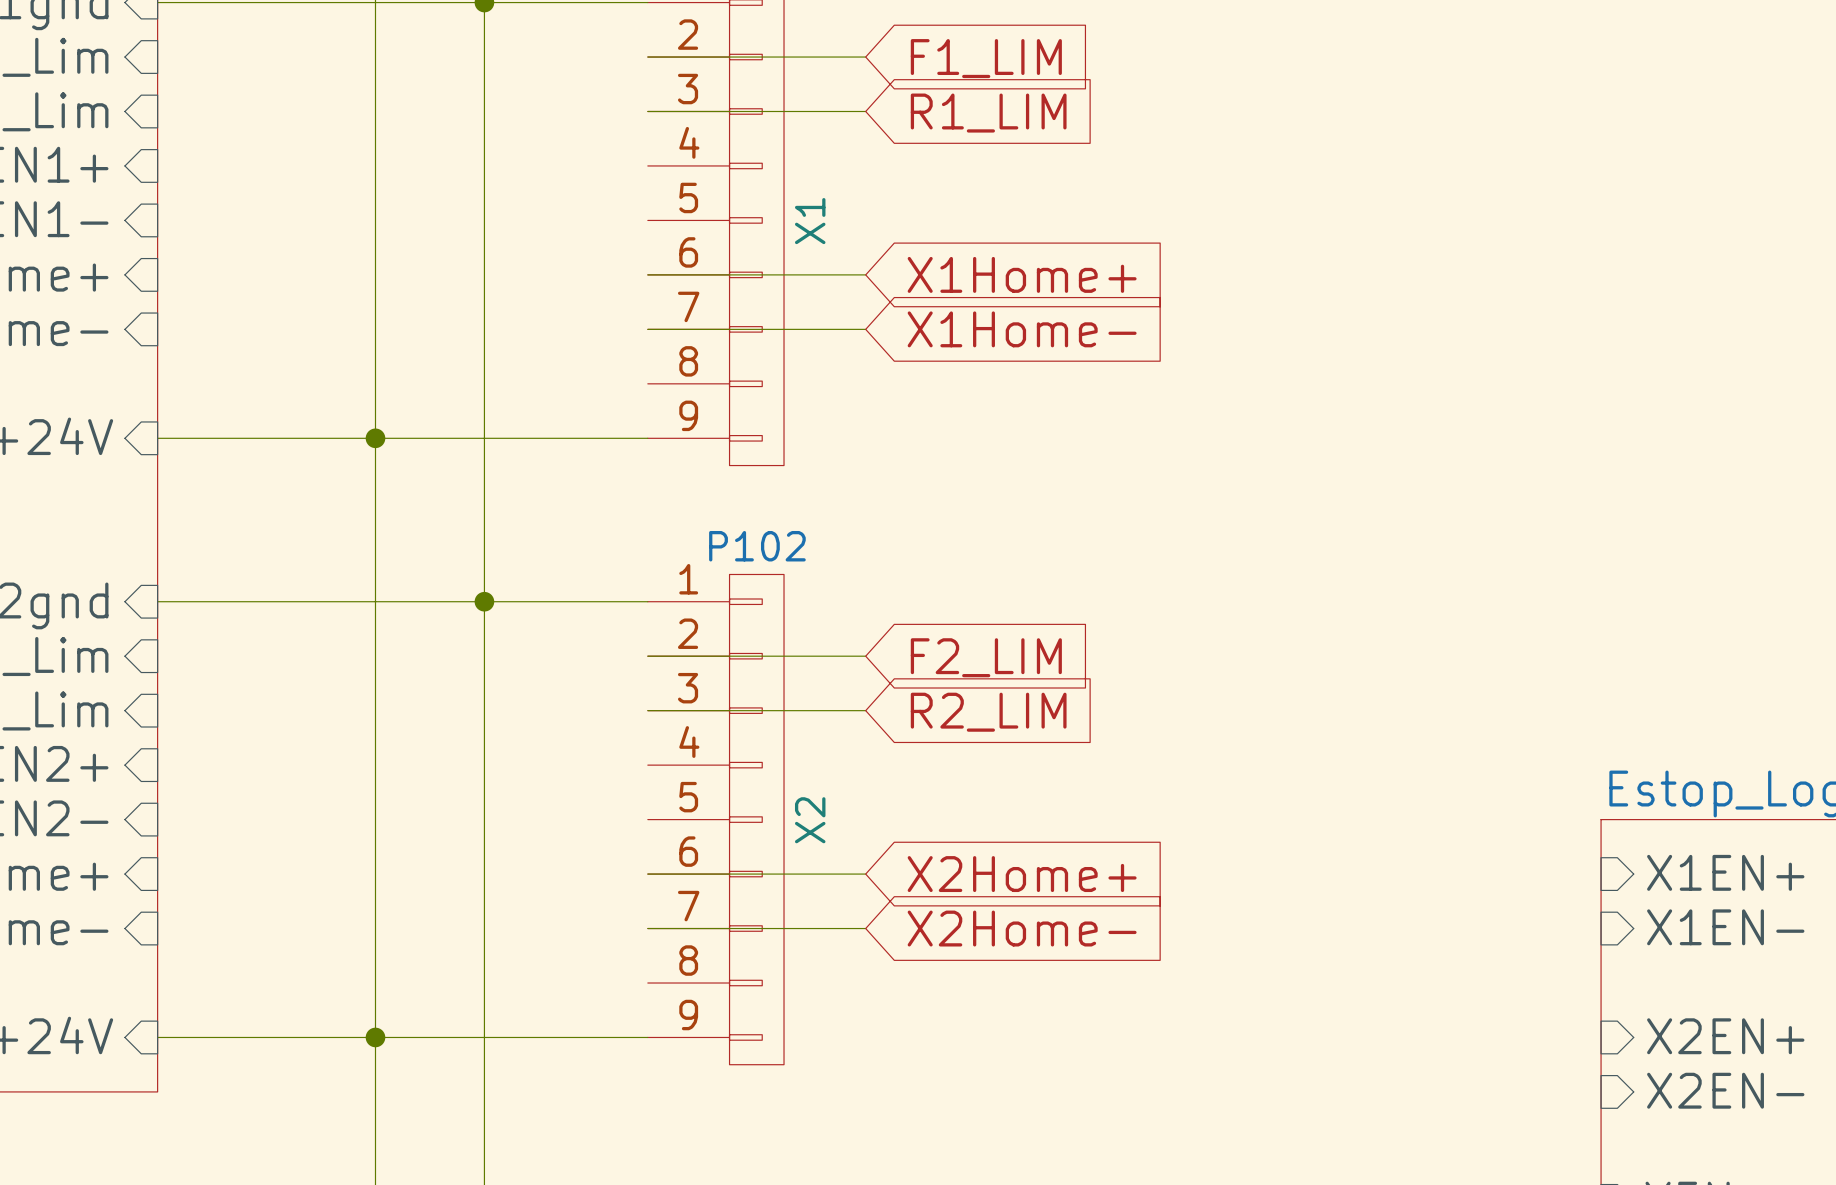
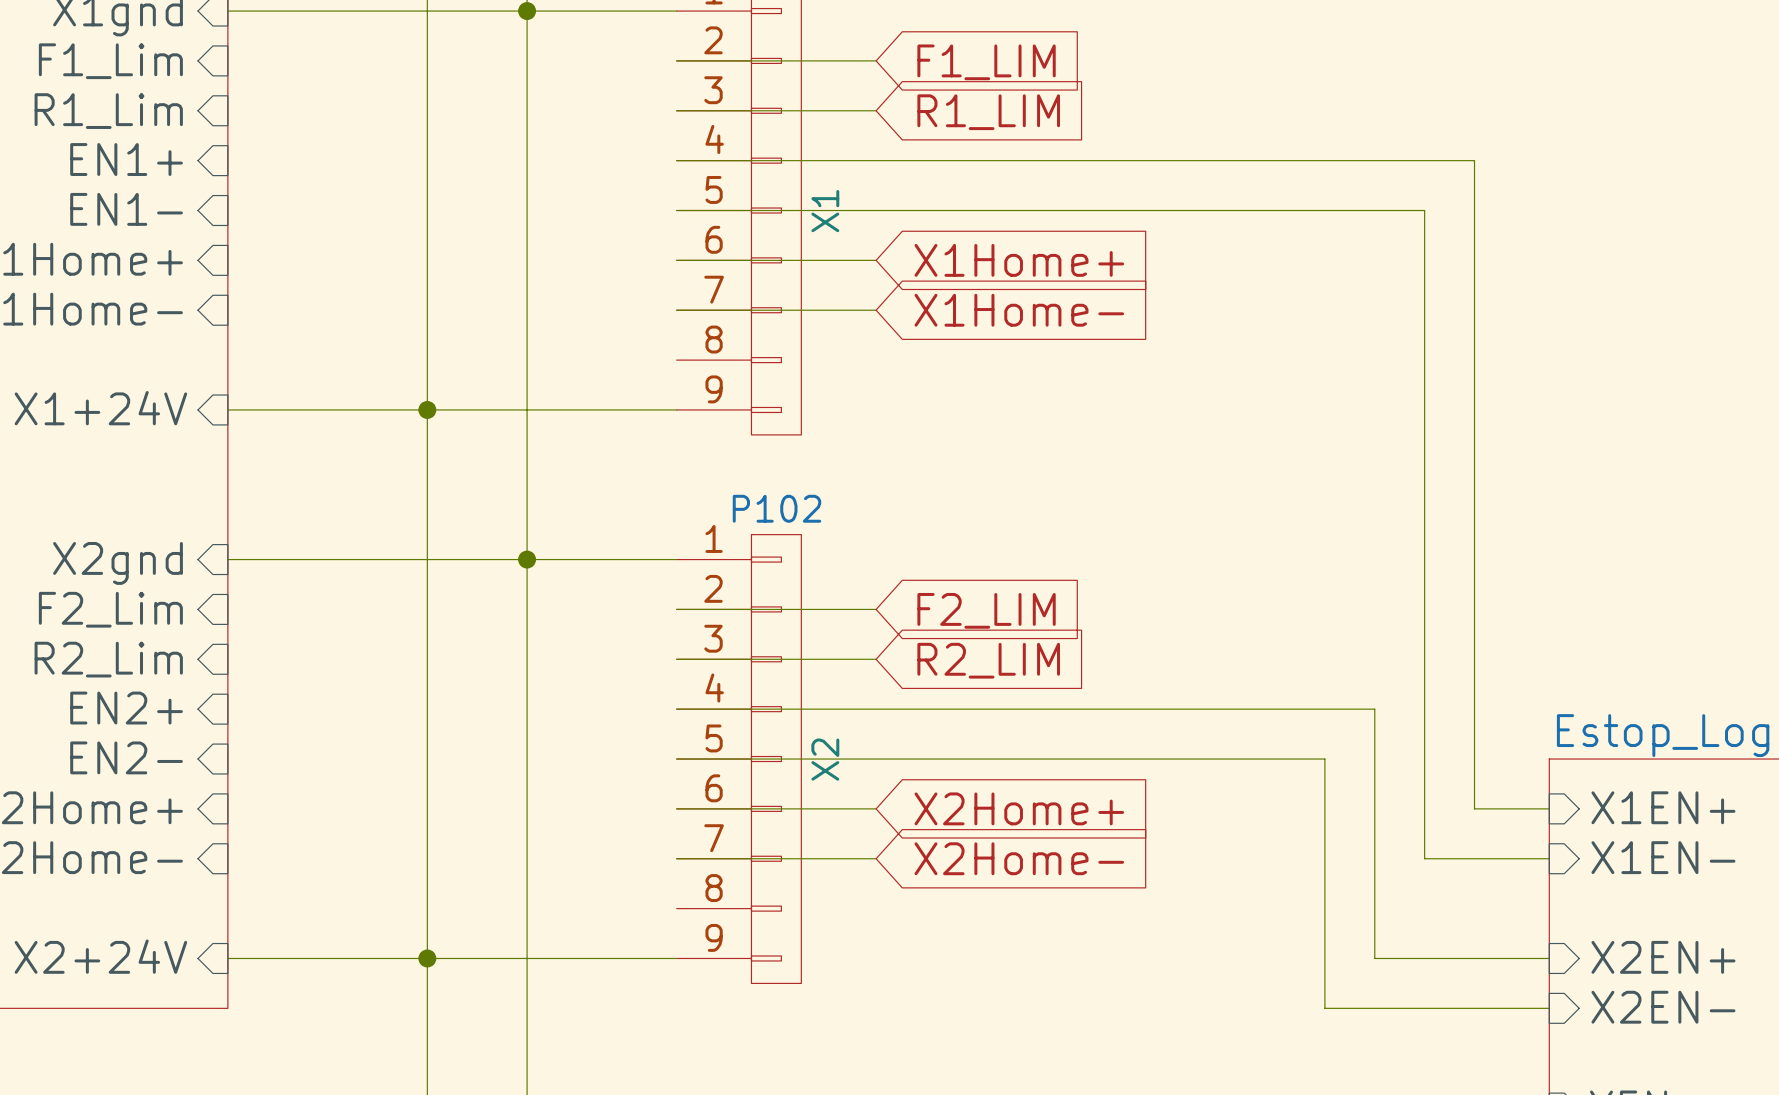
wire: none -> (676, 160) (1474, 160) (1474, 808) (1549, 808)
wire: none -> (676, 210) (1424, 210) (1424, 858) (1549, 858)
wire: none -> (676, 709) (1374, 709) (1374, 958) (1549, 958)
wire: none -> (676, 759) (1324, 759) (1324, 1008) (1549, 1008)

